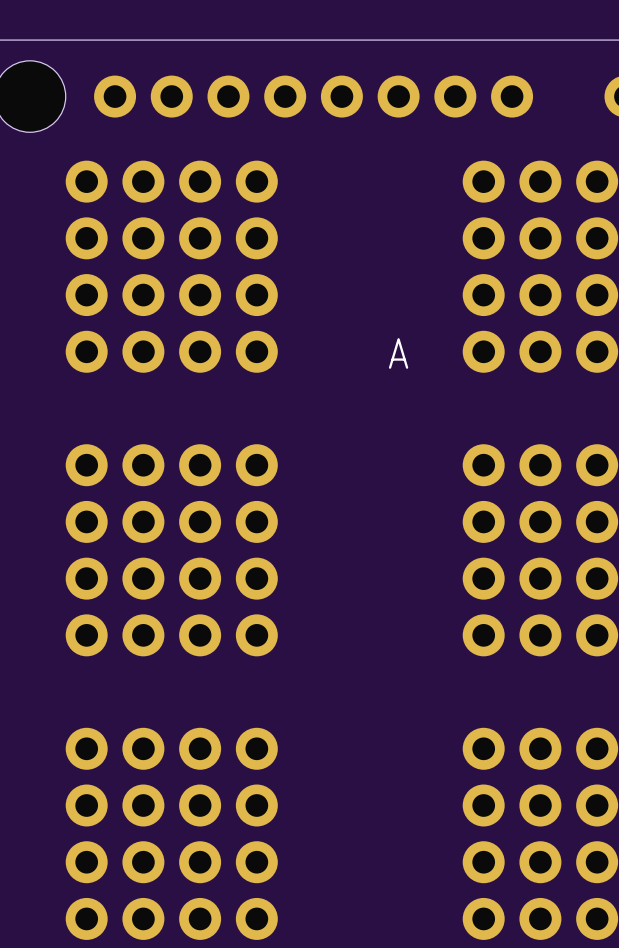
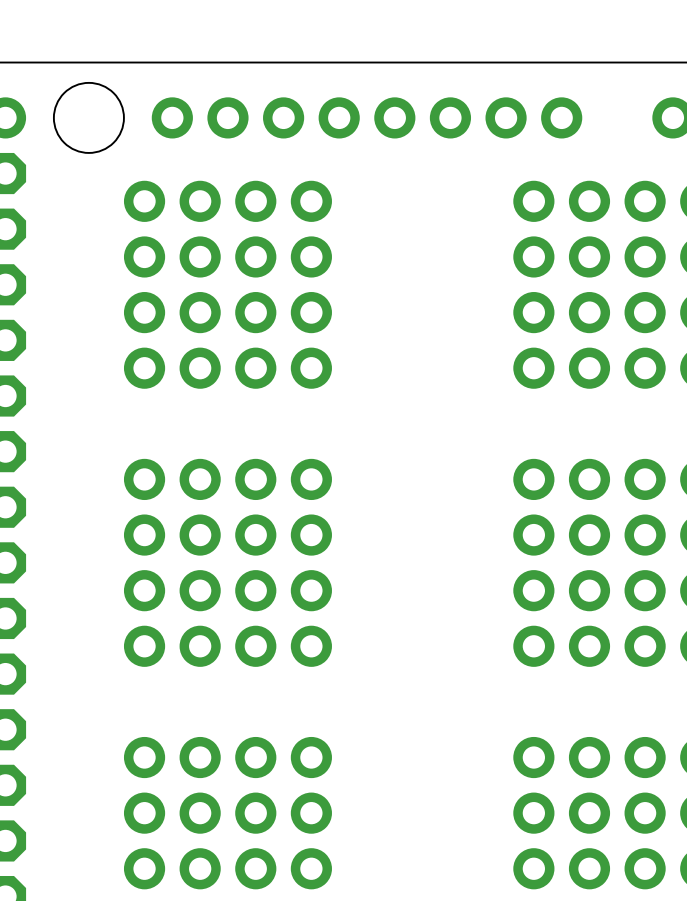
A name: A (398, 353) -> none

